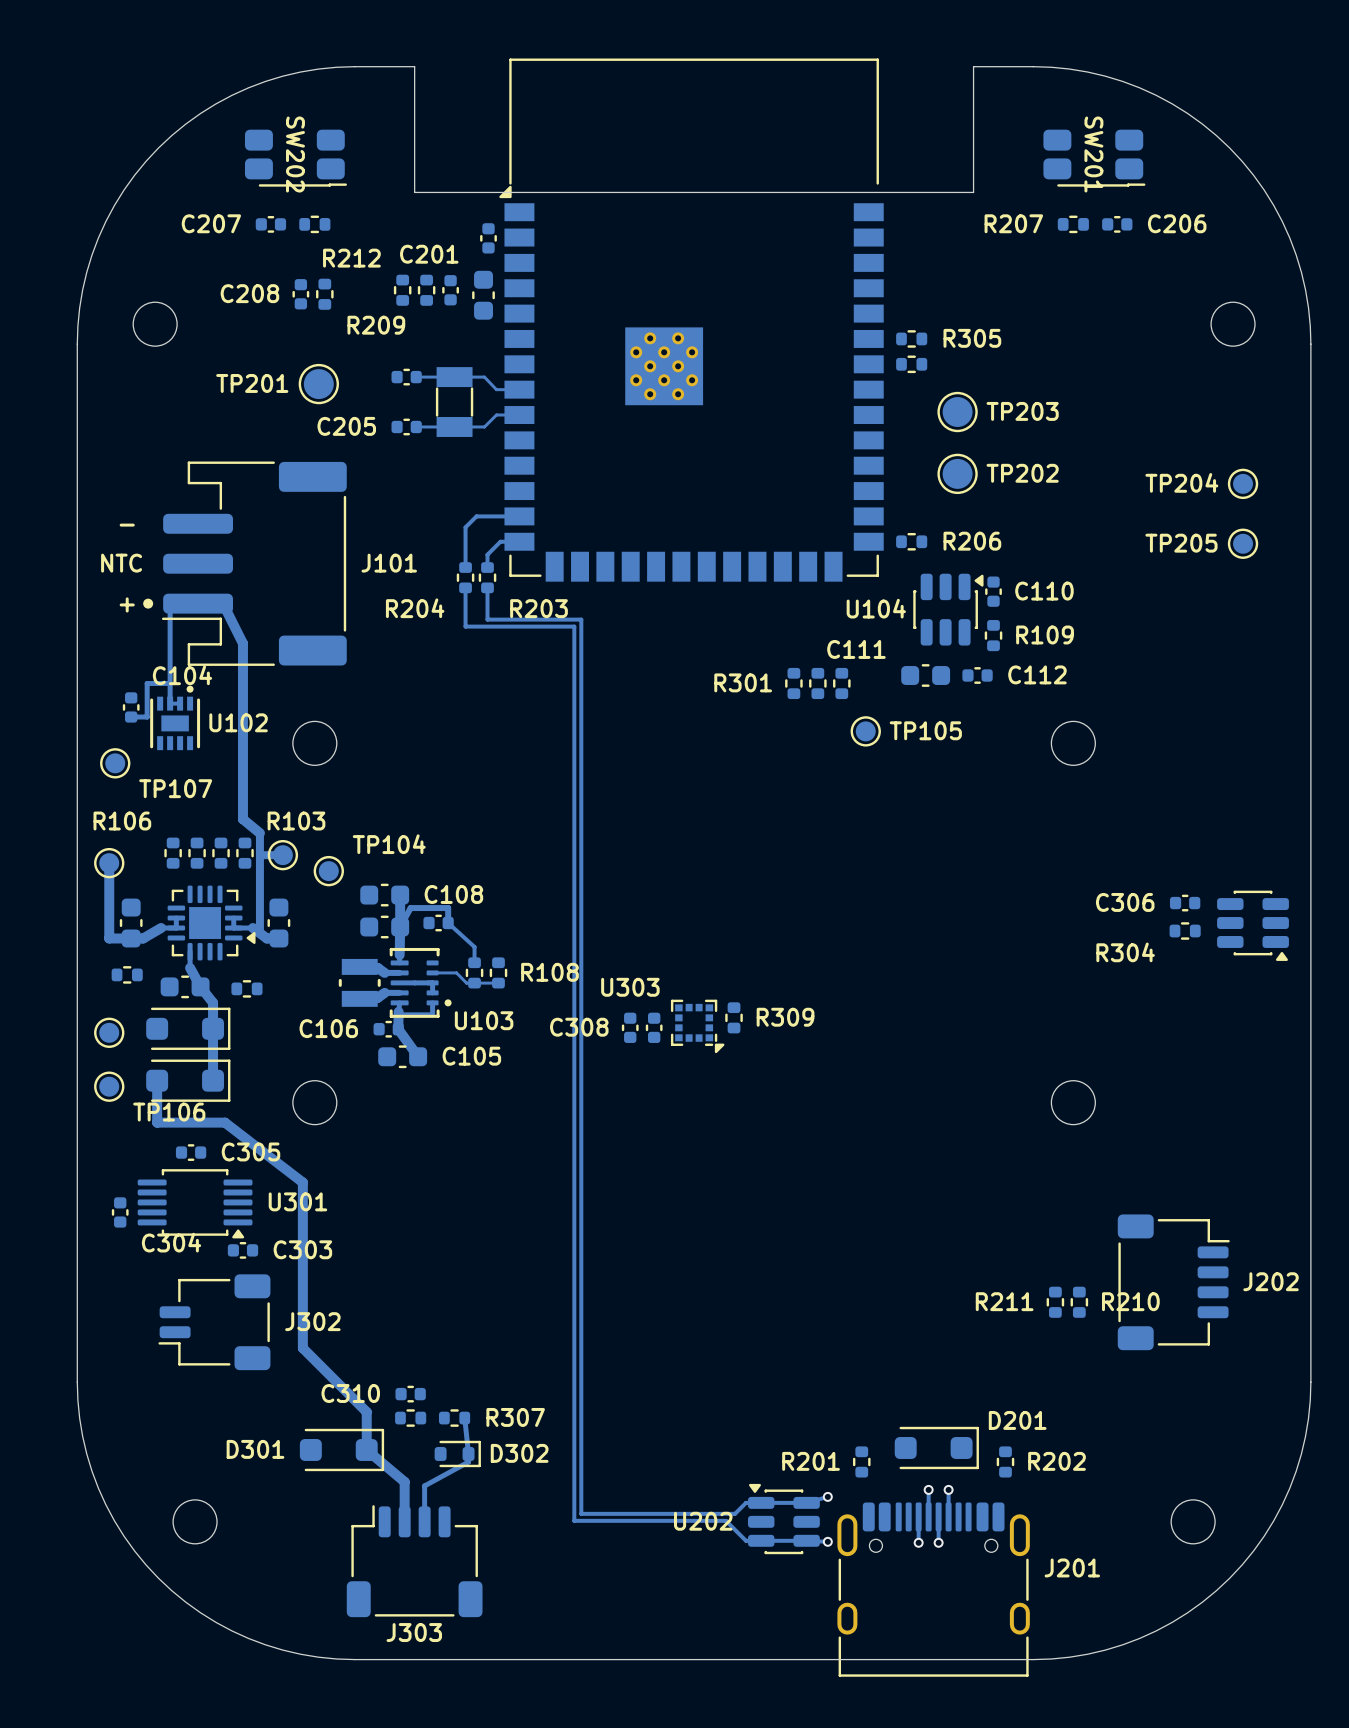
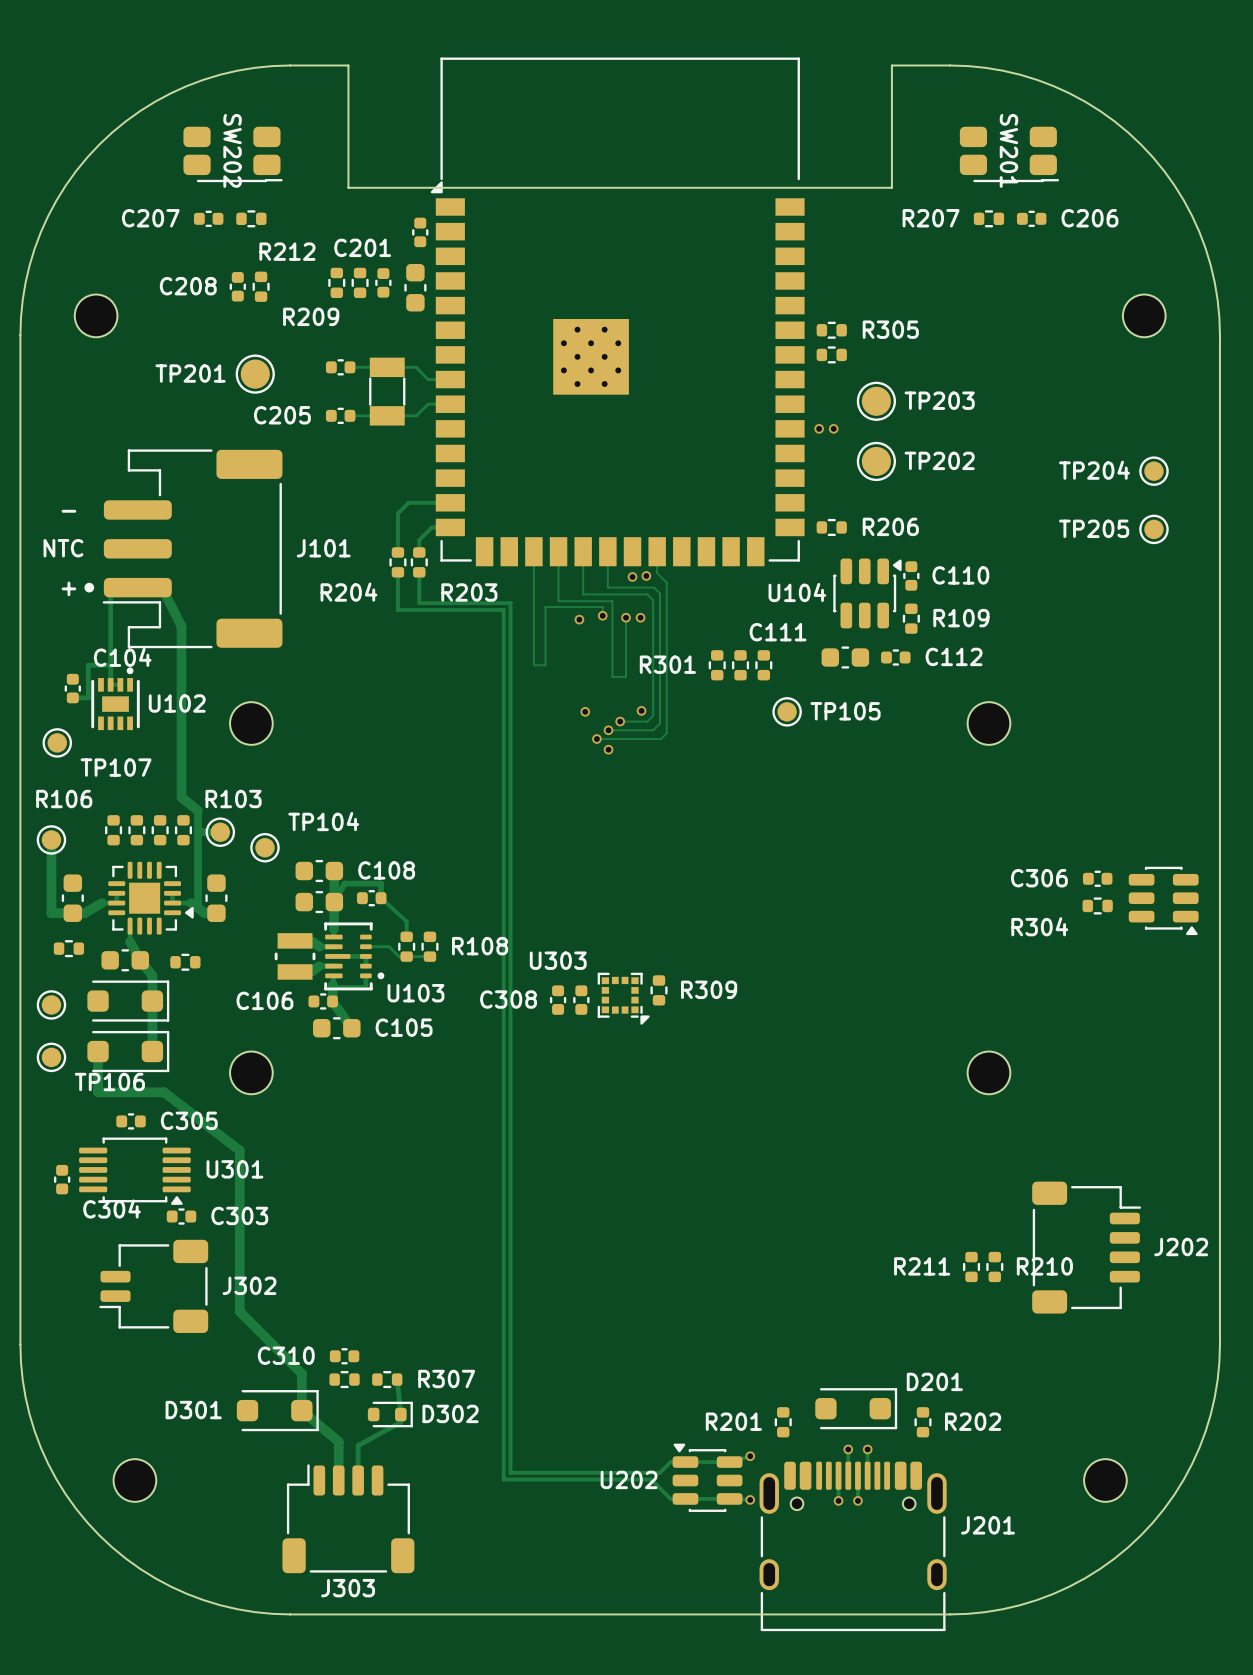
via: none -> (819, 428)
via: none -> (833, 428)
track: none -> (533, 551) (533, 665) (545, 665) (545, 607) (602, 607) (602, 615)
track: none -> (558, 551) (558, 601) (612, 601) (612, 676) (626, 676) (626, 617)
track: none -> (583, 551) (583, 594) (647, 594) (653, 600) (653, 715) (647, 721) (620, 721)
track: none -> (607, 551) (607, 587) (654, 587) (659, 593) (659, 723) (653, 730) (608, 730)
track: none -> (657, 551) (657, 573) (666, 582) (666, 733) (660, 739) (596, 739)
via: none -> (646, 575)
via: none -> (632, 576)
via: none -> (602, 615)
via: none -> (626, 617)
via: none -> (640, 617)
via: none -> (579, 619)
via: none -> (641, 710)
via: none -> (585, 711)
via: none -> (620, 721)
via: none -> (608, 730)
via: none -> (596, 739)
via: none -> (608, 749)

